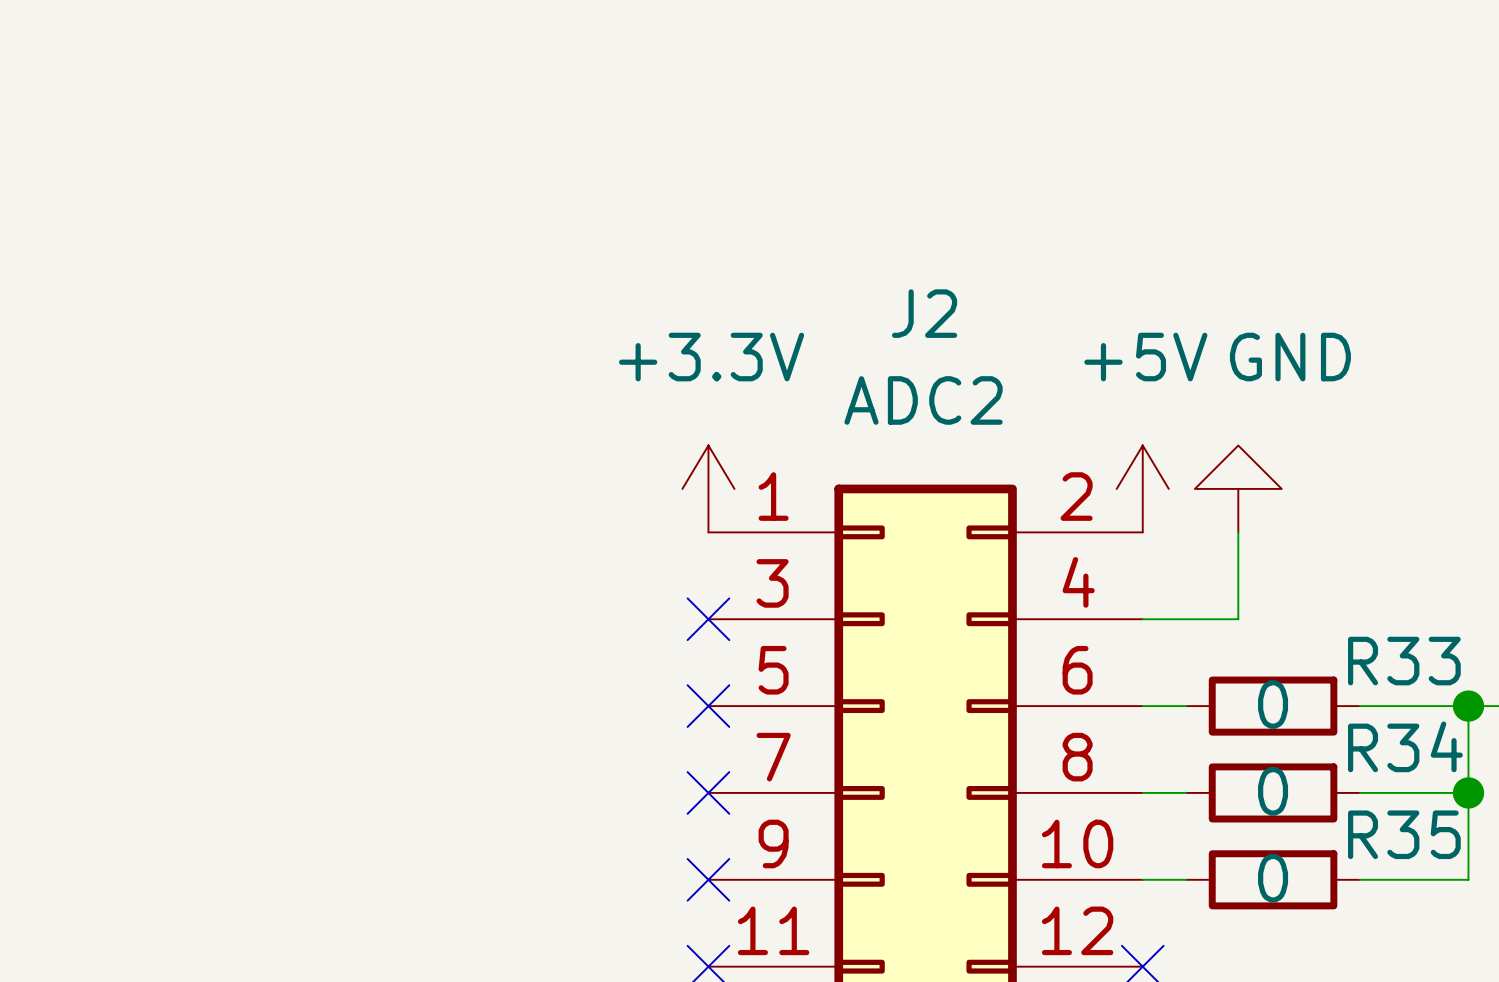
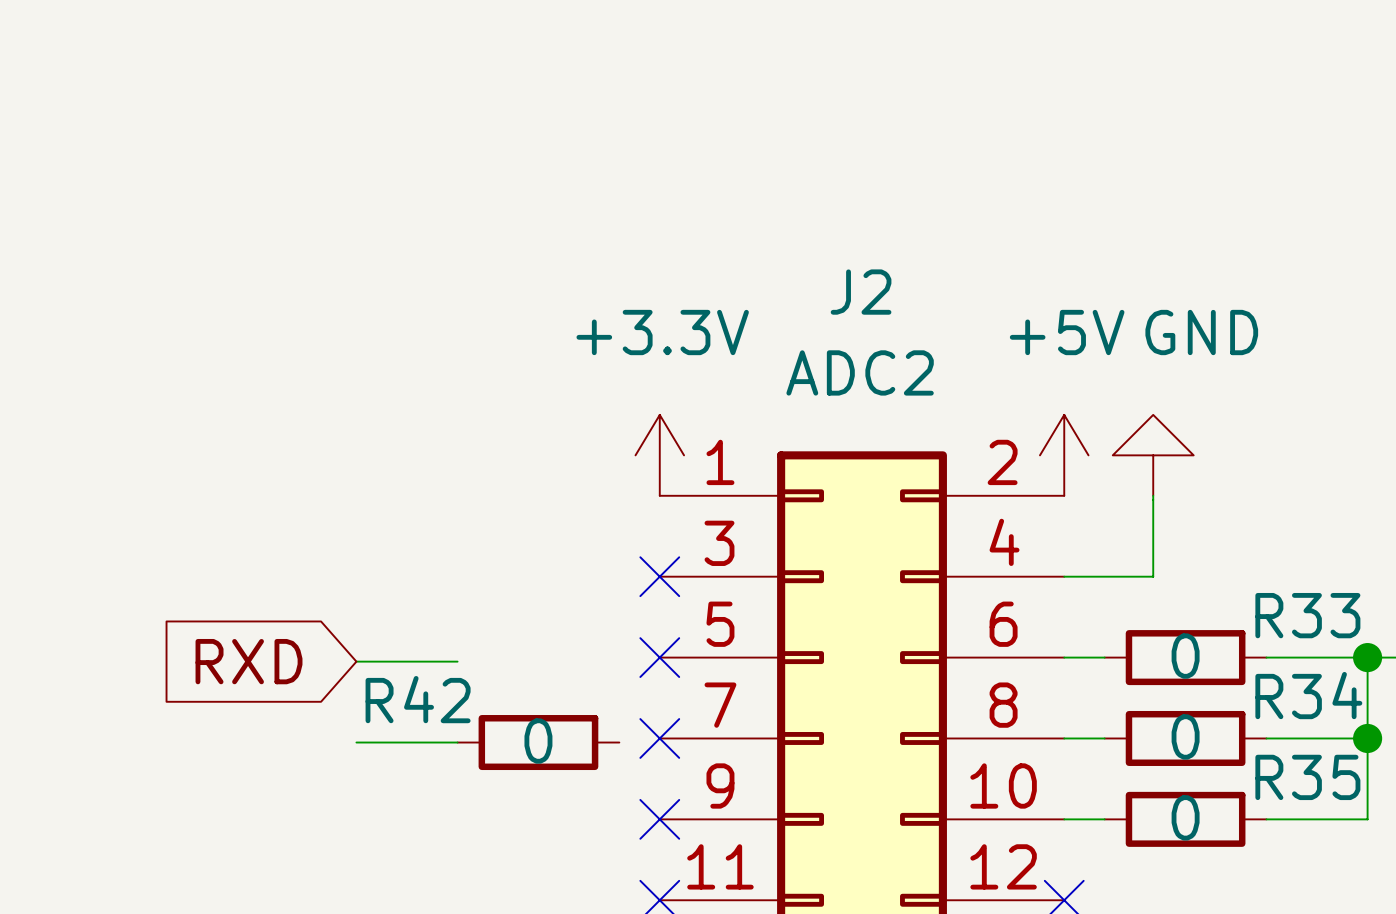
global label: none -> RXD (249, 661)
wire: none -> (356, 661) (457, 661)
wire: none -> (356, 742) (457, 742)
R42: none -> 0 (538, 742)

